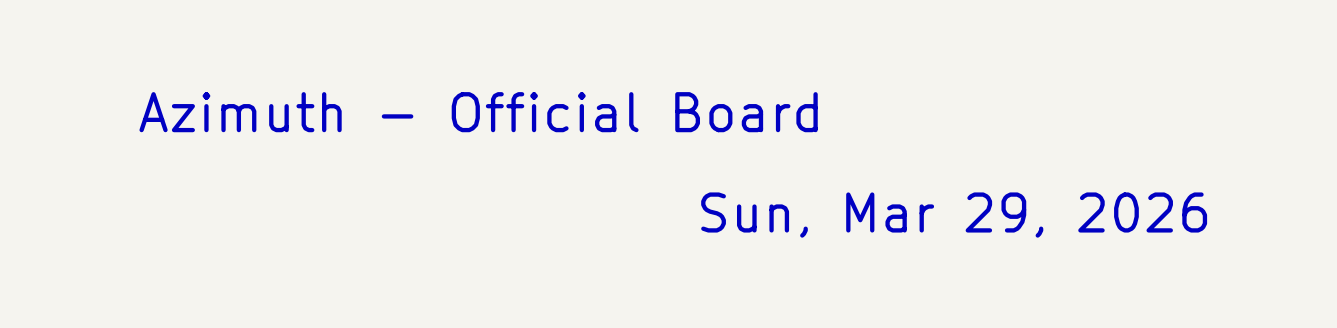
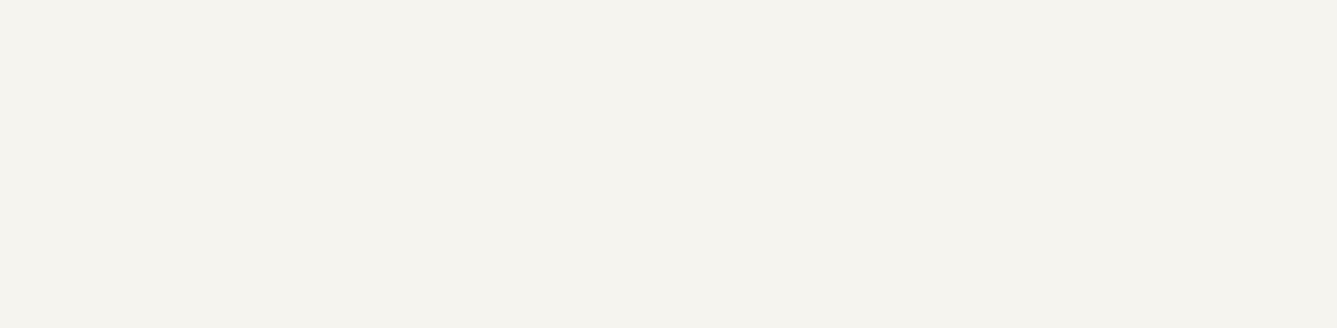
text: Azimuth - Official Board (478, 112) -> none
text: Sun, Mar 29, 2026 (954, 215) -> none

